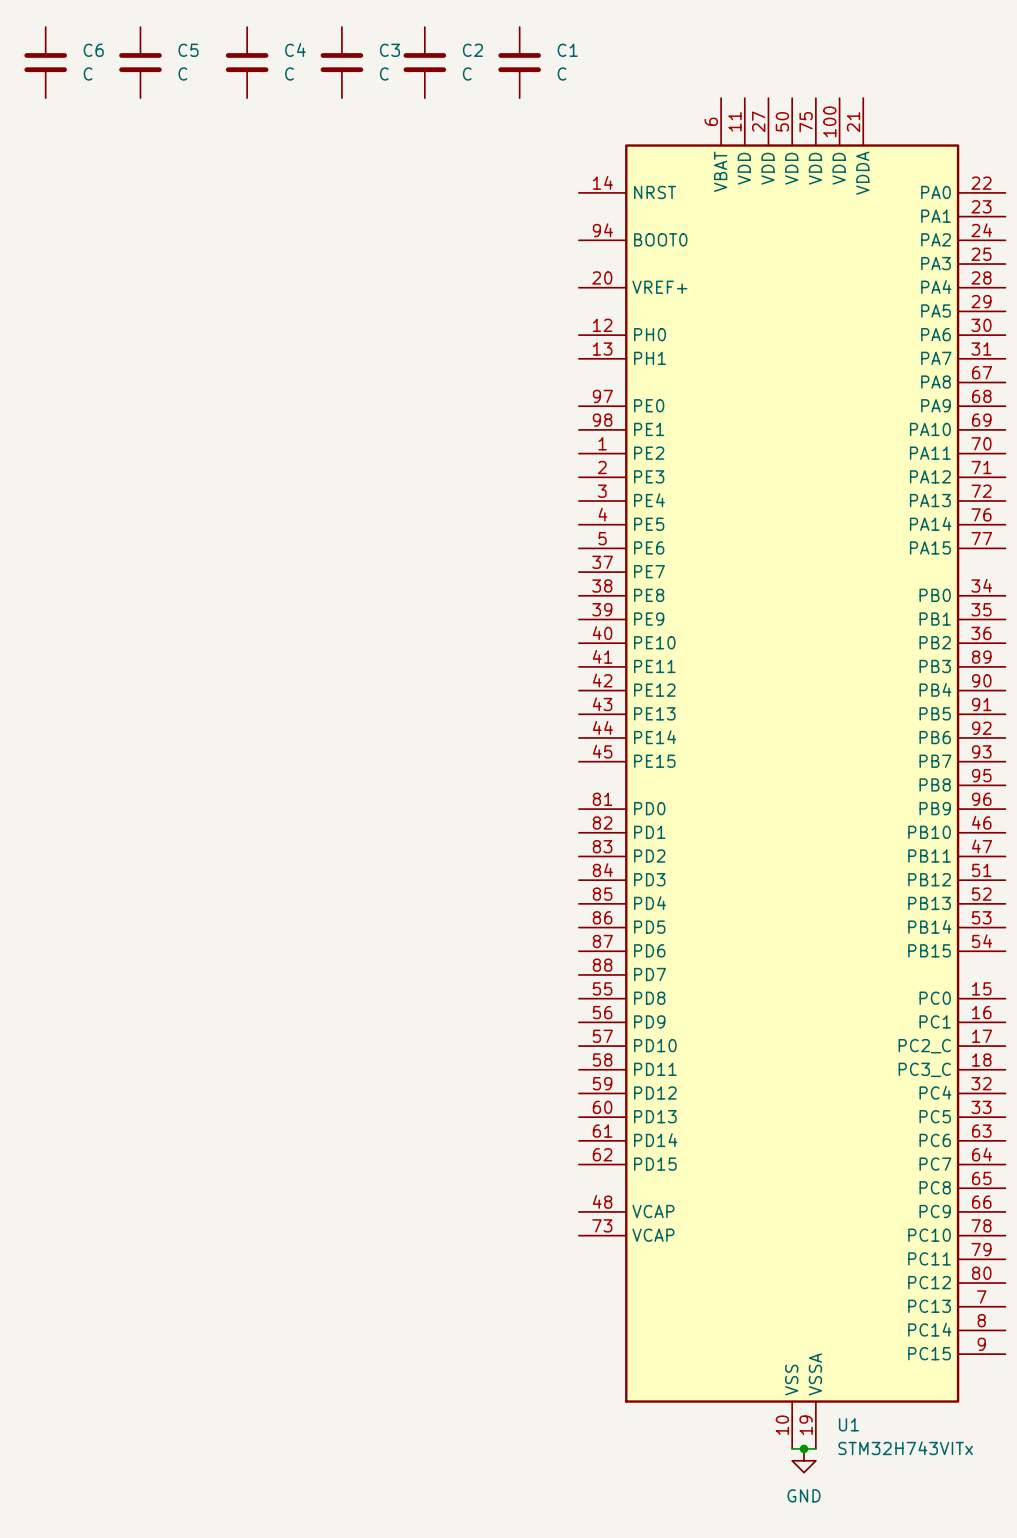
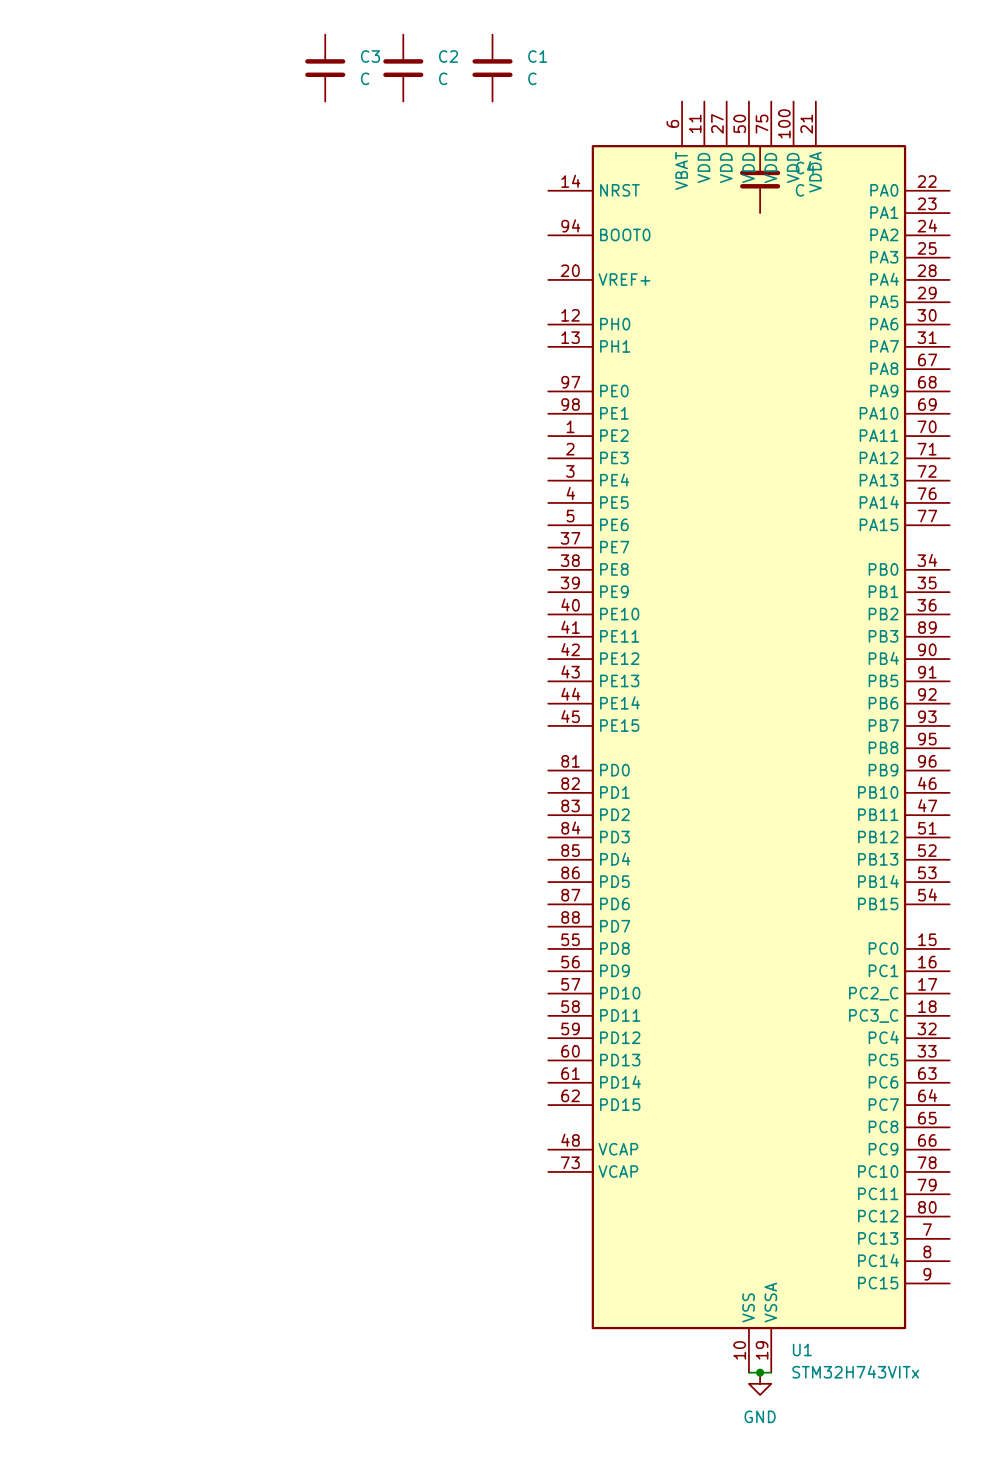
C6: C (45, 62) -> none
C5: C (140, 62) -> none
C4 position: (247, 62) -> (760, 179)

